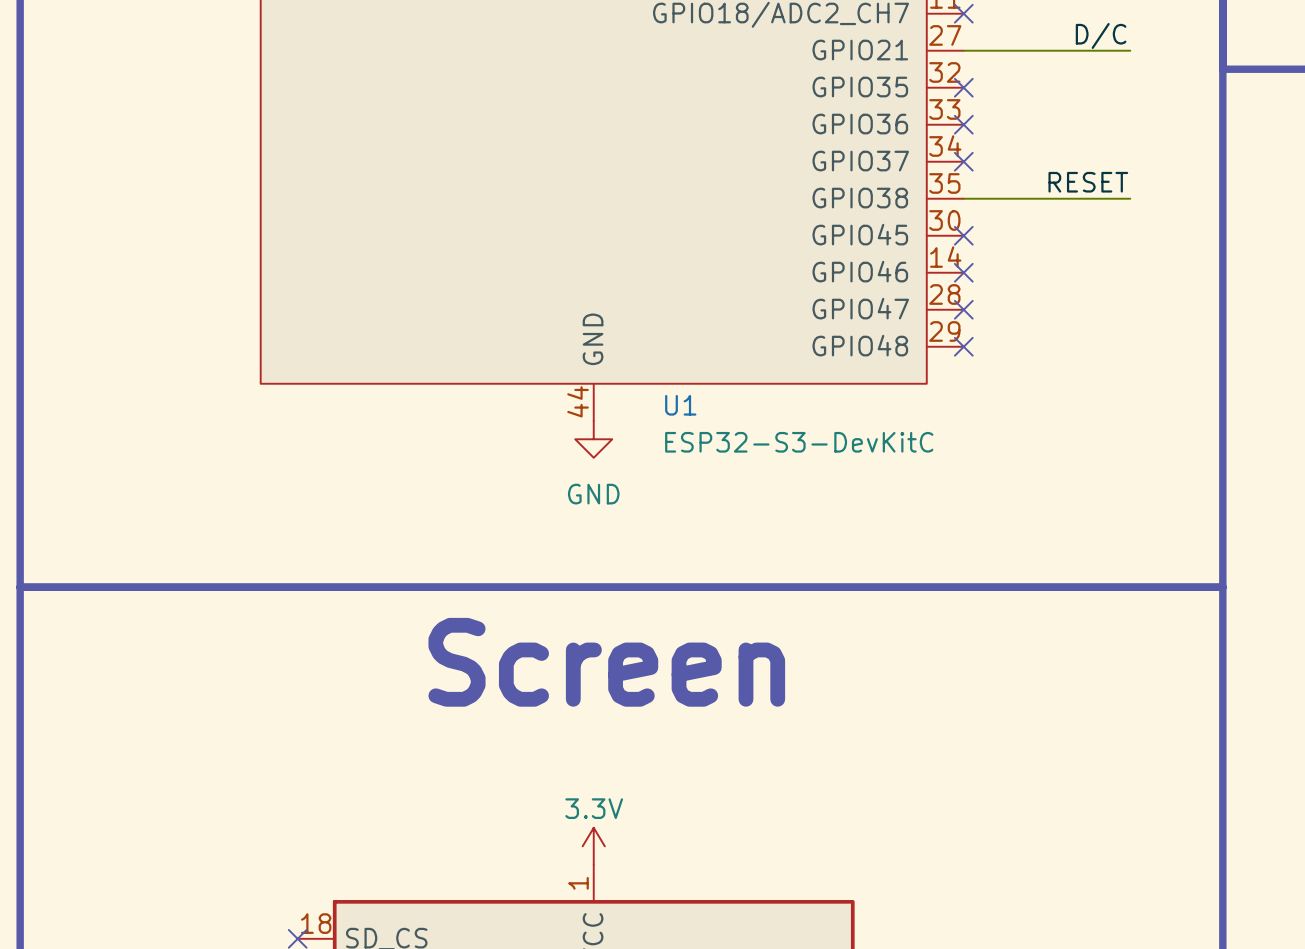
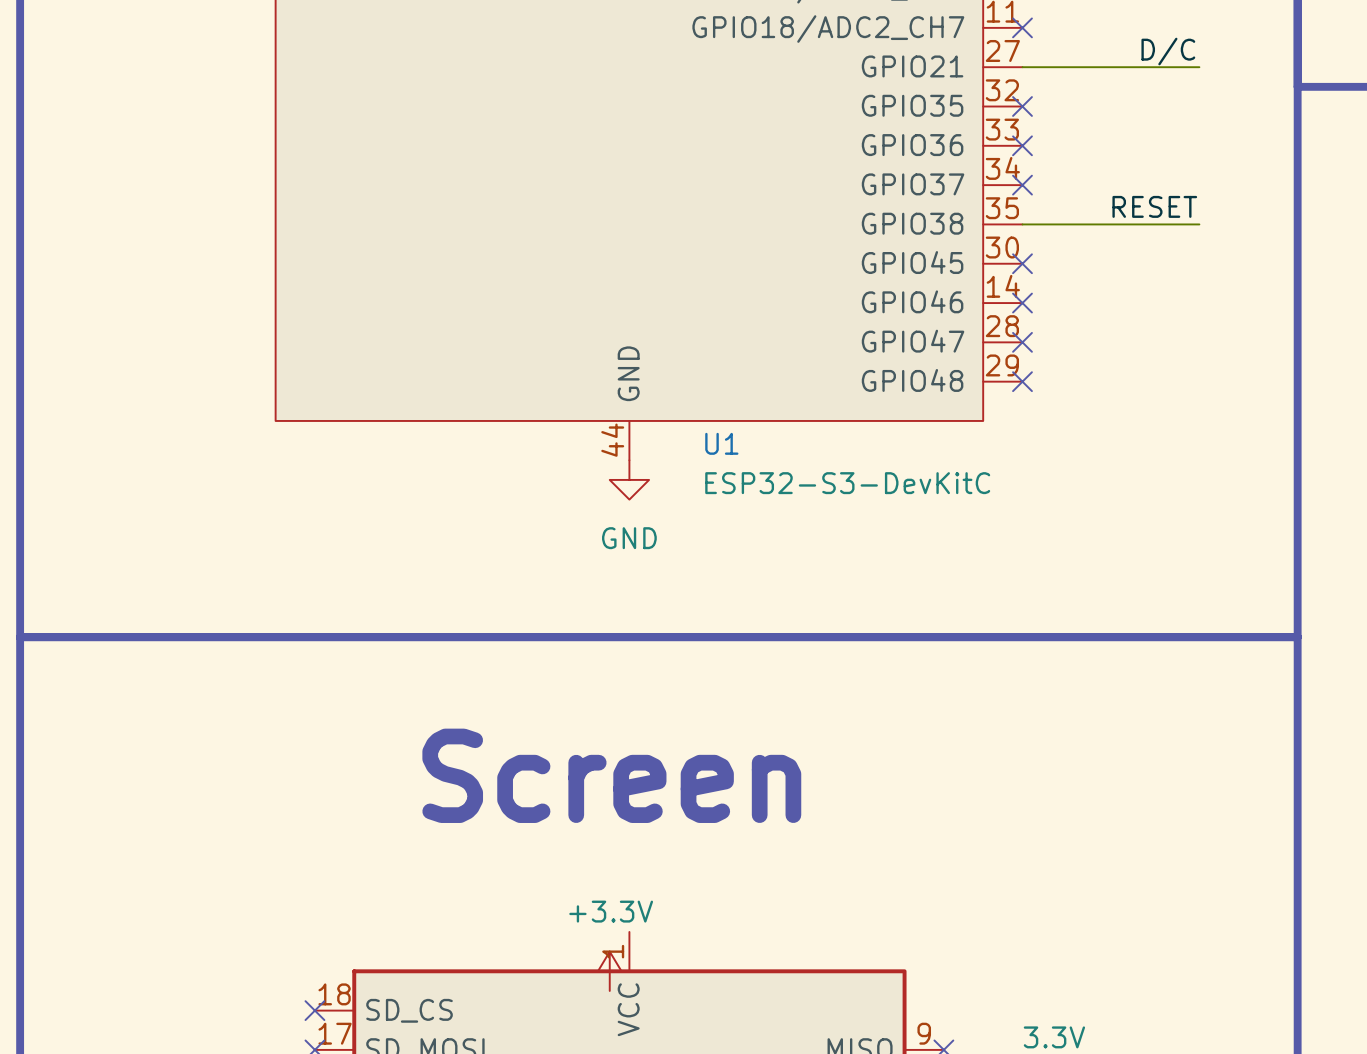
text position: Screen (606, 662) -> Screen (611, 775)
power symbol: 3.3V (593, 846) -> none
power symbol: none -> +3.3V (609, 971)

